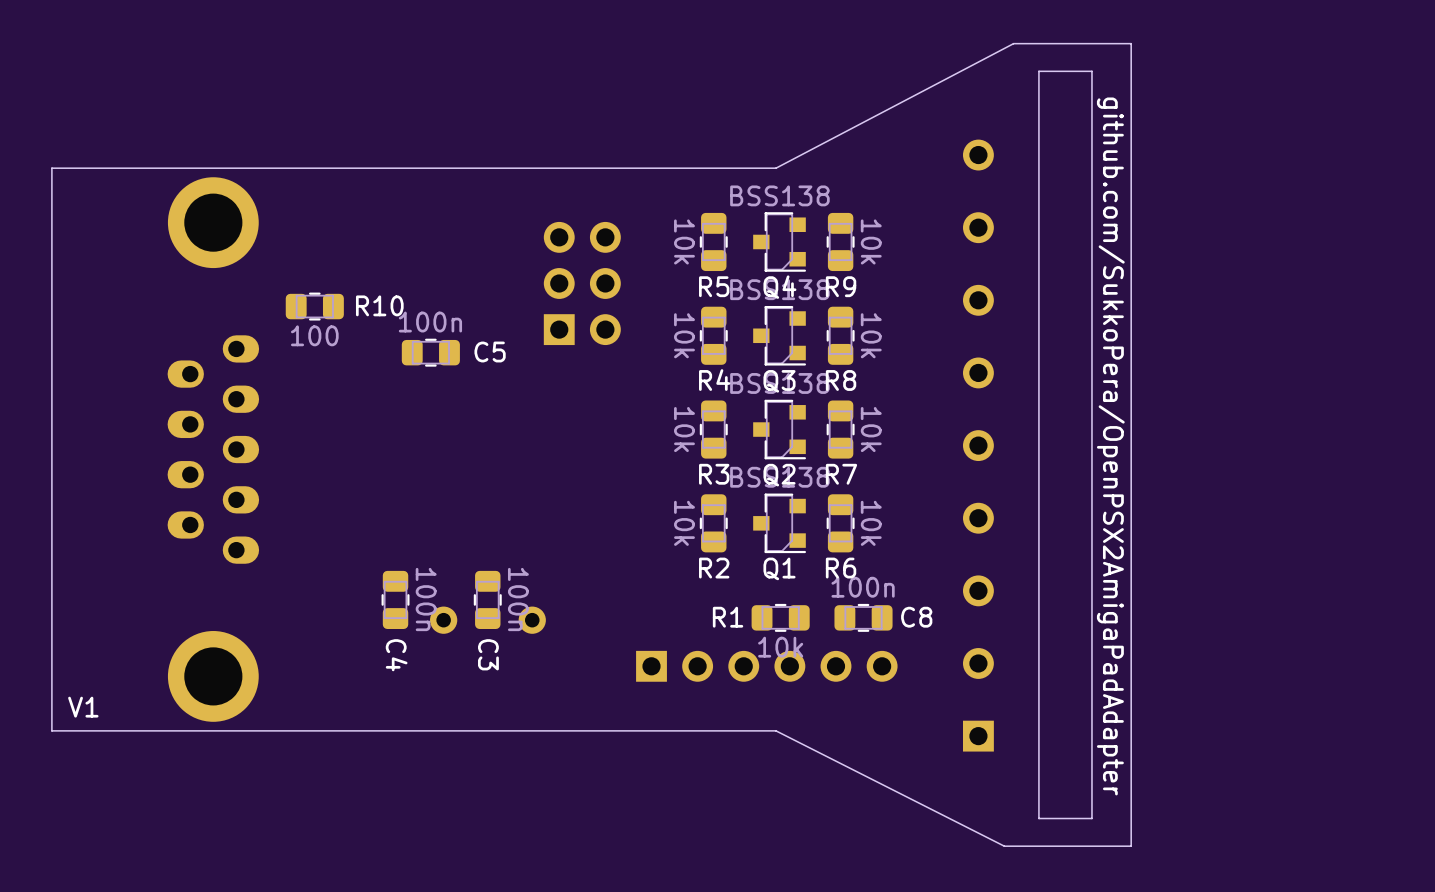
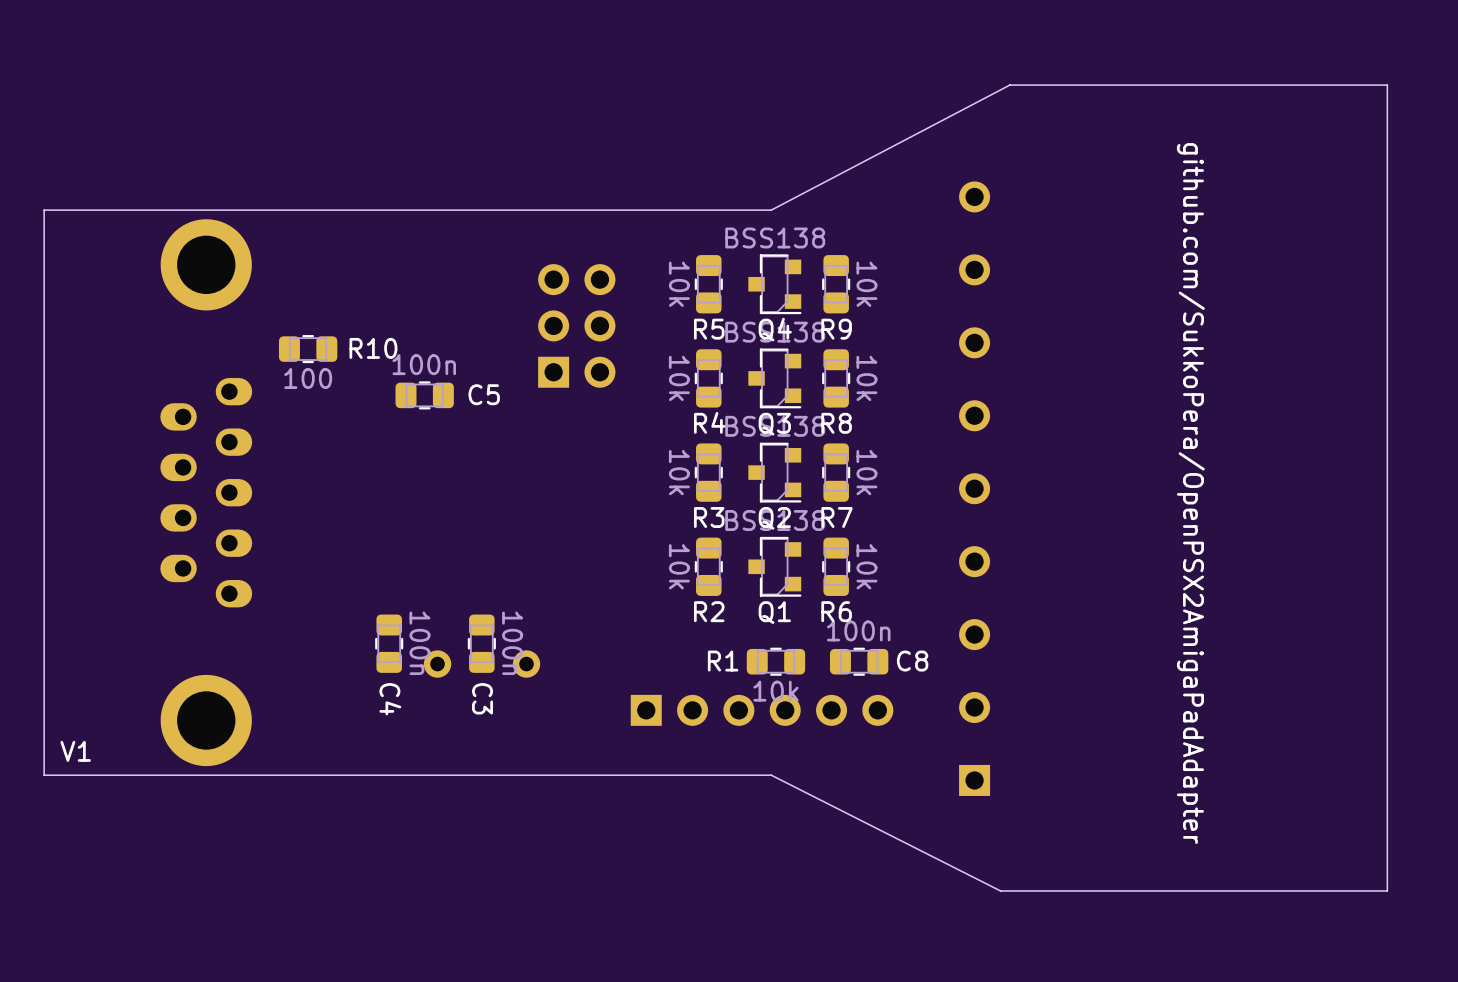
board edge: (1131, 43) (1131, 846) -> (1127, 85) (1387, 85) (1387, 890) (1127, 890)
board edge: (1091, 71) (1038, 71) (1038, 818) (1091, 818) (1091, 71) -> none
text position: github.com/SukkoPera/OpenPSX2AmigaPadAdapter (1110, 446) -> github.com/SukkoPera/OpenPSX2AmigaPadAdapter (1190, 493)

